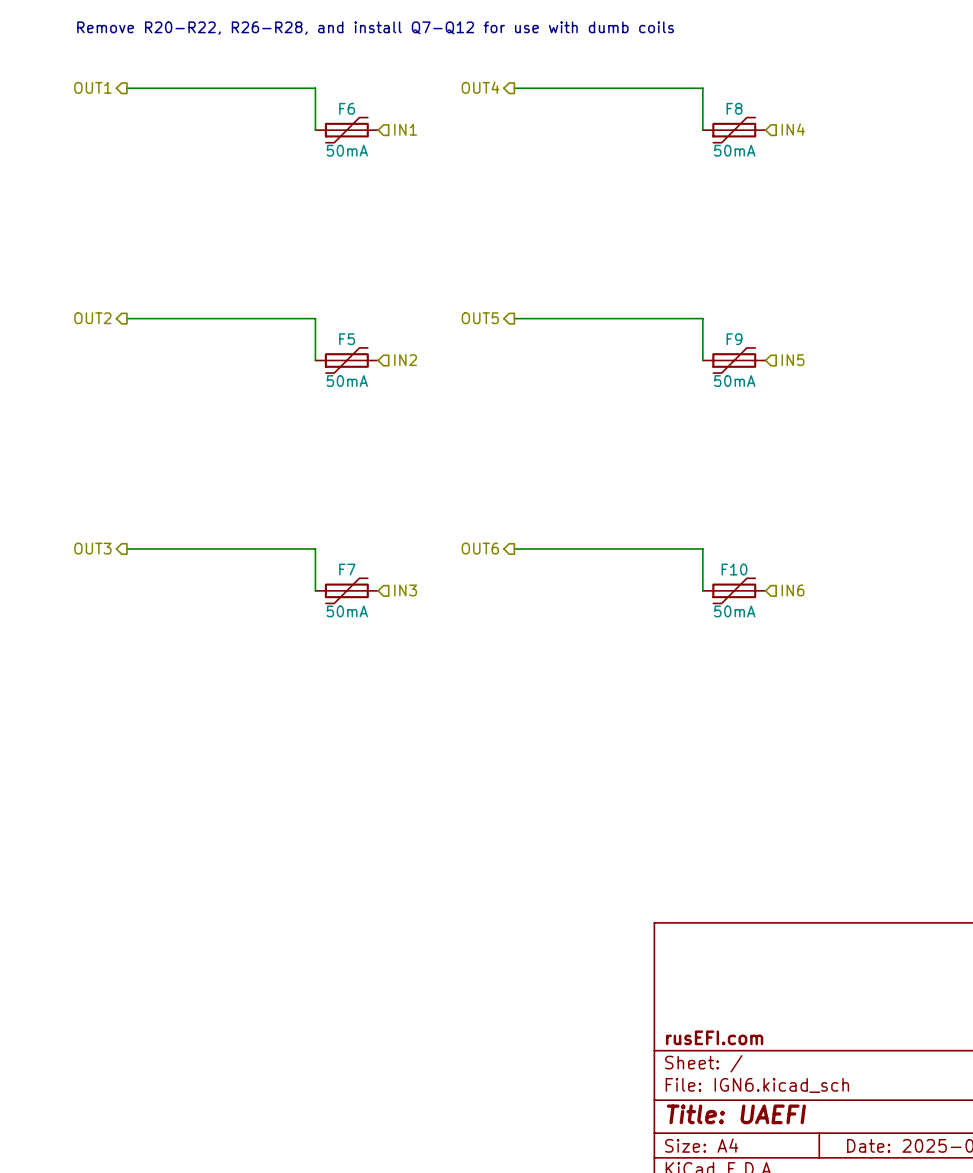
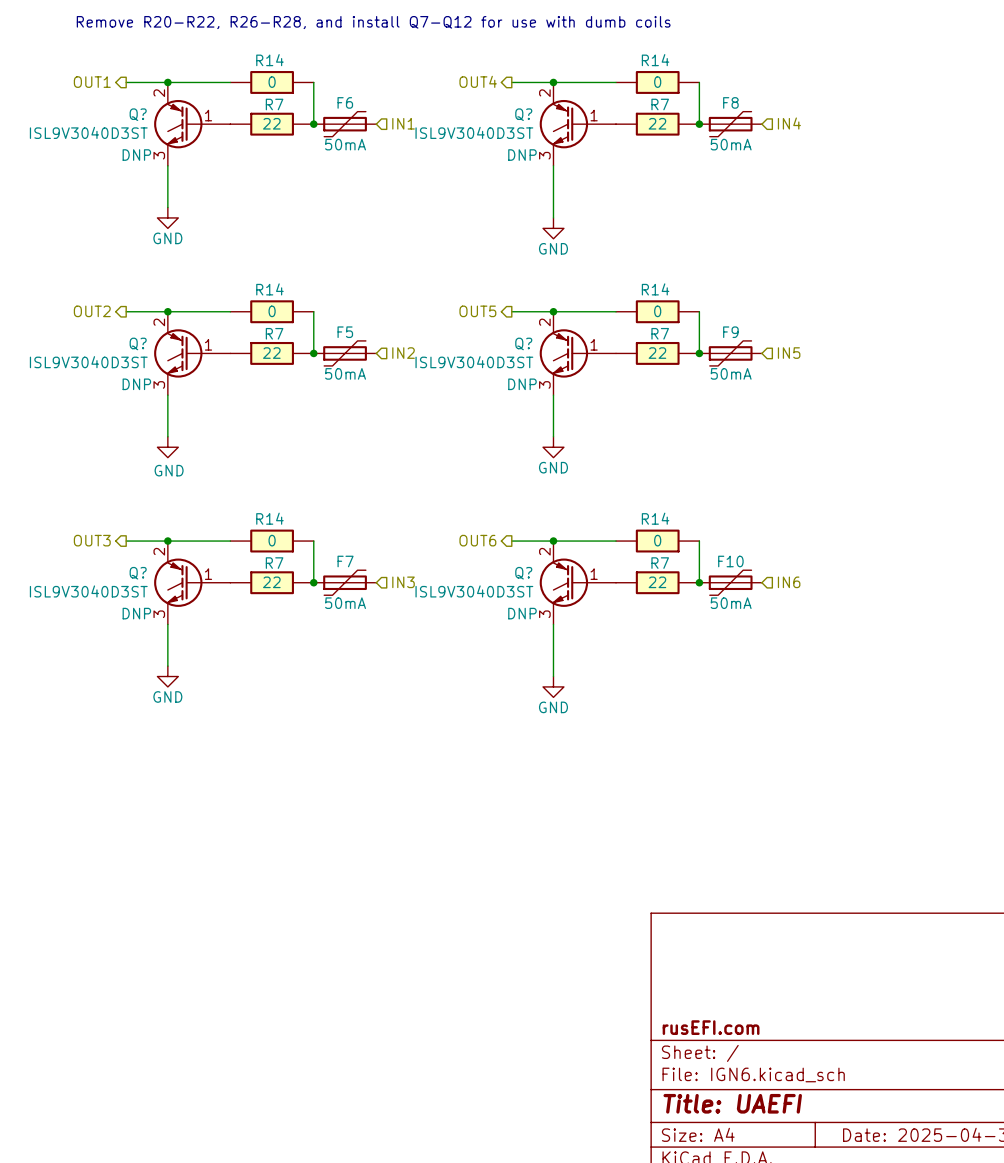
junction: none -> (167, 82)
R14: none -> 0 (272, 82)
junction: none -> (553, 82)
R14: none -> 0 (657, 82)
Q?: none -> ISL9V3040D3ST (192, 124)
R7: none -> 22 (272, 124)
junction: none -> (313, 124)
Q?: none -> ISL9V3040D3ST (577, 124)
R7: none -> 22 (657, 124)
junction: none -> (699, 124)
wire: none -> (167, 165) (167, 207)
wire: none -> (553, 165) (553, 217)
power symbol: none -> GND (167, 217)
power symbol: none -> GND (553, 228)
junction: none -> (167, 311)
R14: none -> 0 (272, 311)
junction: none -> (553, 311)
R14: none -> 0 (657, 311)
Q?: none -> ISL9V3040D3ST (192, 353)
R7: none -> 22 (272, 353)
junction: none -> (313, 353)
Q?: none -> ISL9V3040D3ST (577, 353)
R7: none -> 22 (657, 353)
junction: none -> (699, 353)
wire: none -> (167, 395) (167, 436)
wire: none -> (553, 395) (553, 436)
power symbol: none -> GND (167, 447)
power symbol: none -> GND (553, 447)
junction: none -> (167, 541)
R14: none -> 0 (272, 541)
junction: none -> (553, 541)
R14: none -> 0 (657, 541)
Q?: none -> ISL9V3040D3ST (192, 582)
R7: none -> 22 (272, 582)
junction: none -> (313, 582)
Q?: none -> ISL9V3040D3ST (577, 582)
R7: none -> 22 (657, 582)
junction: none -> (699, 582)
wire: none -> (167, 624) (167, 666)
wire: none -> (553, 624) (553, 676)
power symbol: none -> GND (167, 676)
power symbol: none -> GND (553, 686)

